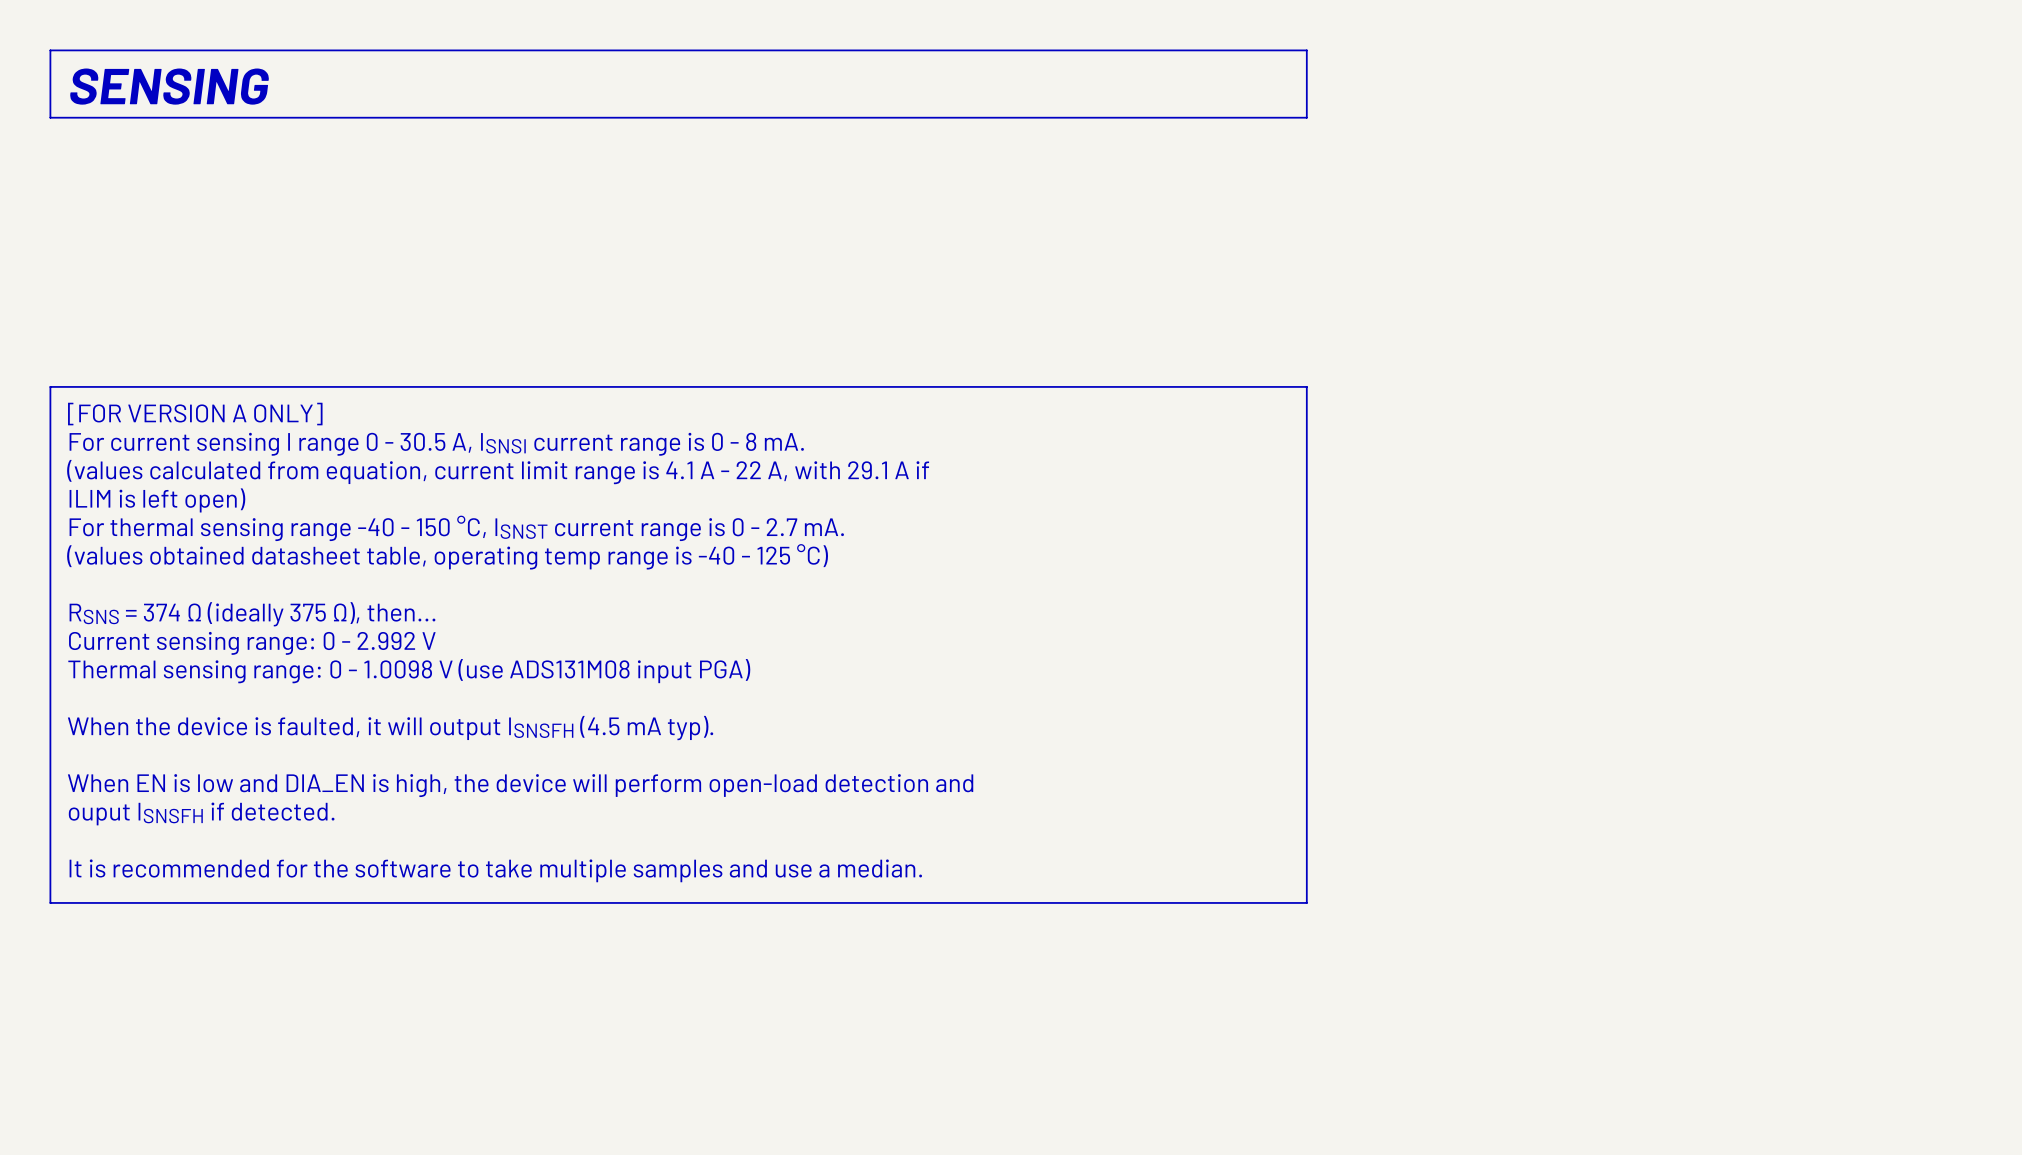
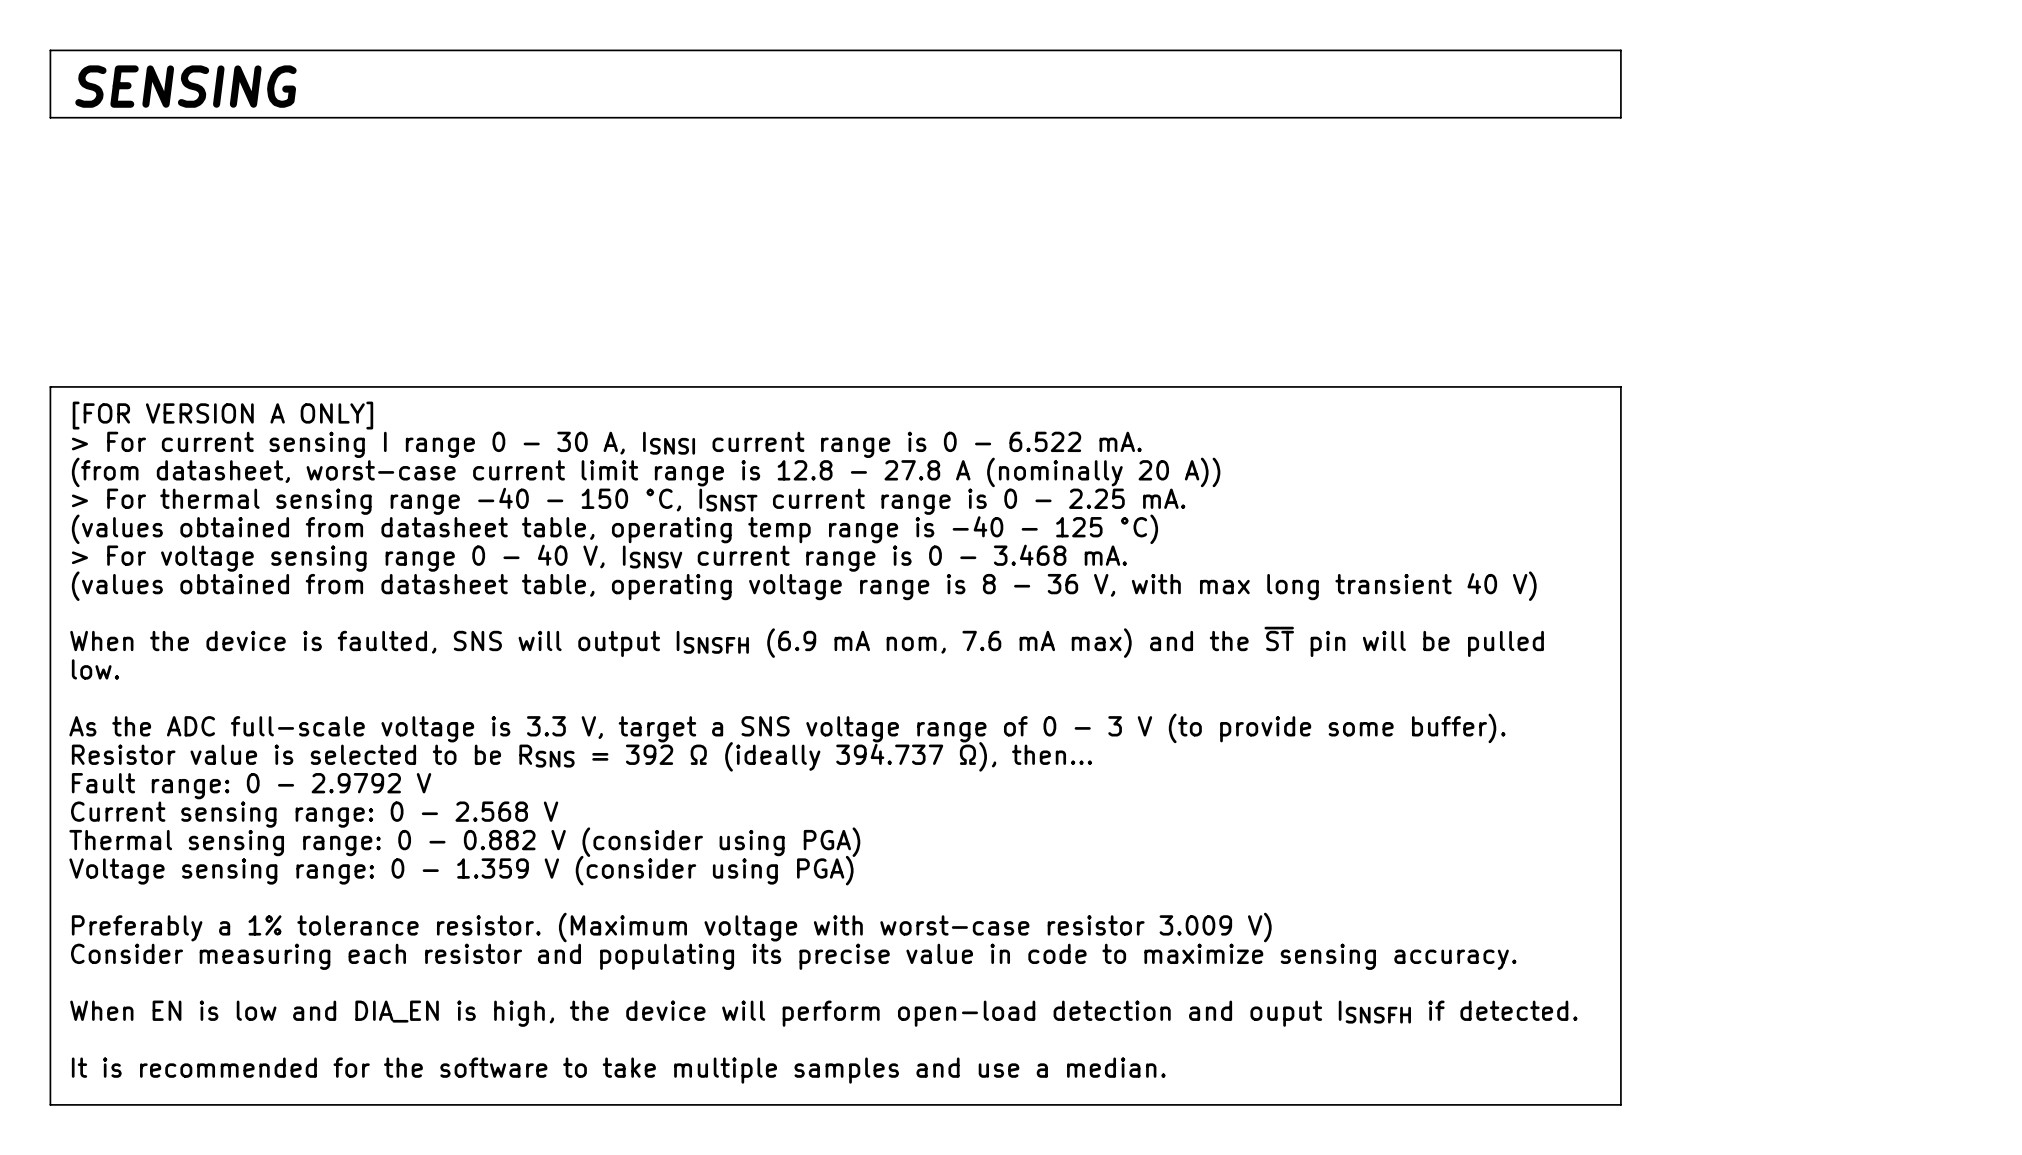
line: (1306, 50) (1306, 117) -> (1306, 50) (1620, 50) (1620, 117) (1306, 117)
line: (1306, 386) (1306, 902) (50, 902) -> (1306, 386) (1620, 386) (1620, 1104) (50, 1104) (50, 902)
text: For current sensing I range 0 - 30.5 A, ISNSI current range is 0 - 8 mA. (436, 444) -> > For current sensing I range 0 - 30 A, ISNSI current range is 0 - 6.522 mA. (606, 444)
text: (values calculated from equation, current limit range is 4.1 A - 22 A, with 29.1 A if (498, 472) -> (from datasheet, worst-case current limit range is 12.8 - 27.8 A (nominally 20 A)) (646, 472)
text: ILIM is left open) (157, 500) -> > For thermal sensing range -40 - 150 °C, ISNST current range is 0 - 2.25 mA. (628, 501)
text: For thermal sensing range -40 - 150 °C, ISNST current range is 0 - 2.7 mA. (456, 528) -> (values obtained from datasheet table, operating temp range is -40 - 125 °C) (614, 529)
text: (values obtained datasheet table, operating temp range is -40 - 125 °C) (447, 556) -> > For voltage sensing range 0 - 40 V, ISNSV current range is 0 - 3.468 mA. (599, 558)
text: none -> (values obtained from datasheet table, operating voltage range is 8 - 36 V, with max long transient 40 V) (804, 586)
text: RSNS = 374 Ω (ideally 375 Ω), then... (252, 614) -> none
text: Current sensing range: 0 - 2.992 V (252, 643) -> When the device is faulted, SNS will output ISNSFH (6.9 mA nom, 7.6 mA max) and the ~{ST} pin will be pulled (807, 642)
text: Thermal sensing range: 0 - 1.0098 V (use ADS131M08 input PGA) (409, 671) -> low. (95, 669)
text: When the device is faulted, it will output ISNSFH (4.5 mA typ). (390, 728) -> As the ADC full-scale voltage is 3.3 V, target a SNS voltage range of 0 - 3 V (to provide some buffer). (787, 728)
text: none -> Resistor value is selected to be RSNS = 392 Ω (ideally 394.737 Ω), then... (581, 756)
text: When EN is low and DIA_EN is high, the device will perform open-load detection and (520, 785) -> Fault range: 0 - 2.9792 V (251, 786)
text: ouput ISNSFH if detected. (201, 813) -> Current sensing range: 0 - 2.568 V (314, 814)
text: none -> Thermal sensing range: 0 - 0.882 V (consider using PGA) (464, 842)
text: It is recommended for the software to take multiple samples and use a median. (495, 870) -> Voltage sensing range: 0 - 1.359 V (consider using PGA) (461, 870)
text: none -> Preferably a 1% tolerance resistor. (Maximum voltage with worst-case resistor 3.009 V) (671, 927)
text: none -> Consider measuring each resistor and populating its precise value in code to maximize sensing accuracy. (793, 956)
text: none -> When EN is low and DIA_EN is high, the device will perform open-load detection and ouput ISNSFH if detected. (823, 1013)
text: none -> It is recommended for the software to take multiple samples and use a median. (618, 1070)

